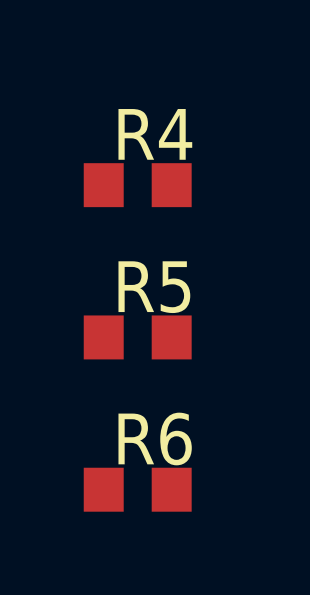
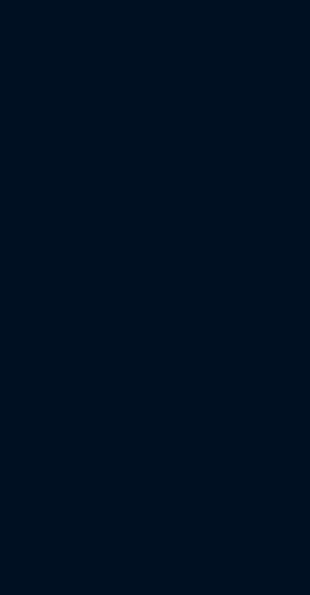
R4: (137, 185) -> none
R5: (137, 337) -> none
R6: (137, 489) -> none

